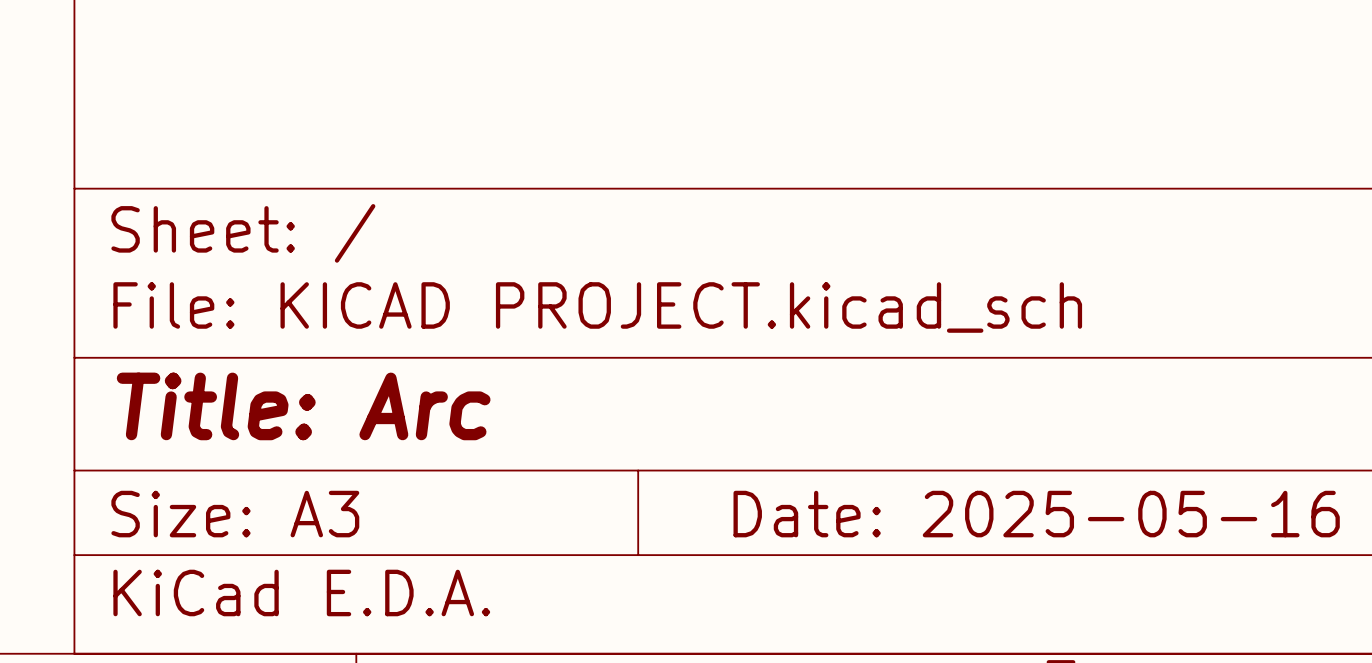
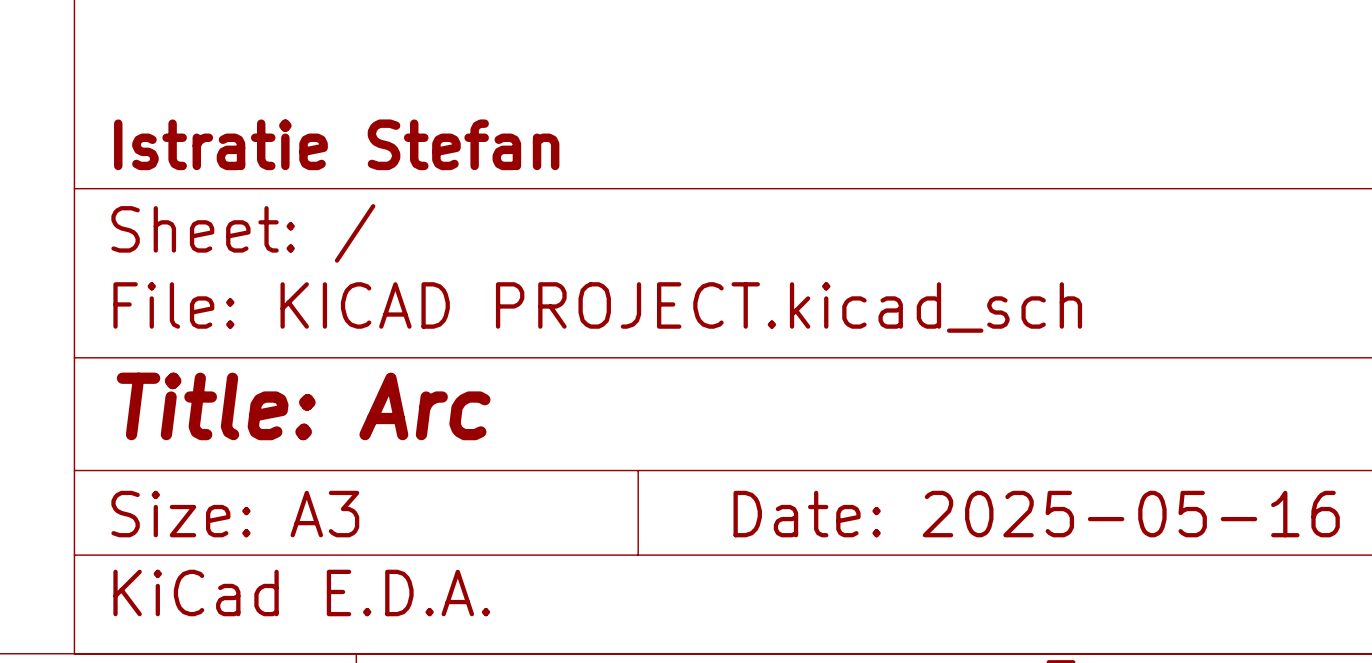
title block: none -> Istratie Stefan (336, 144)

